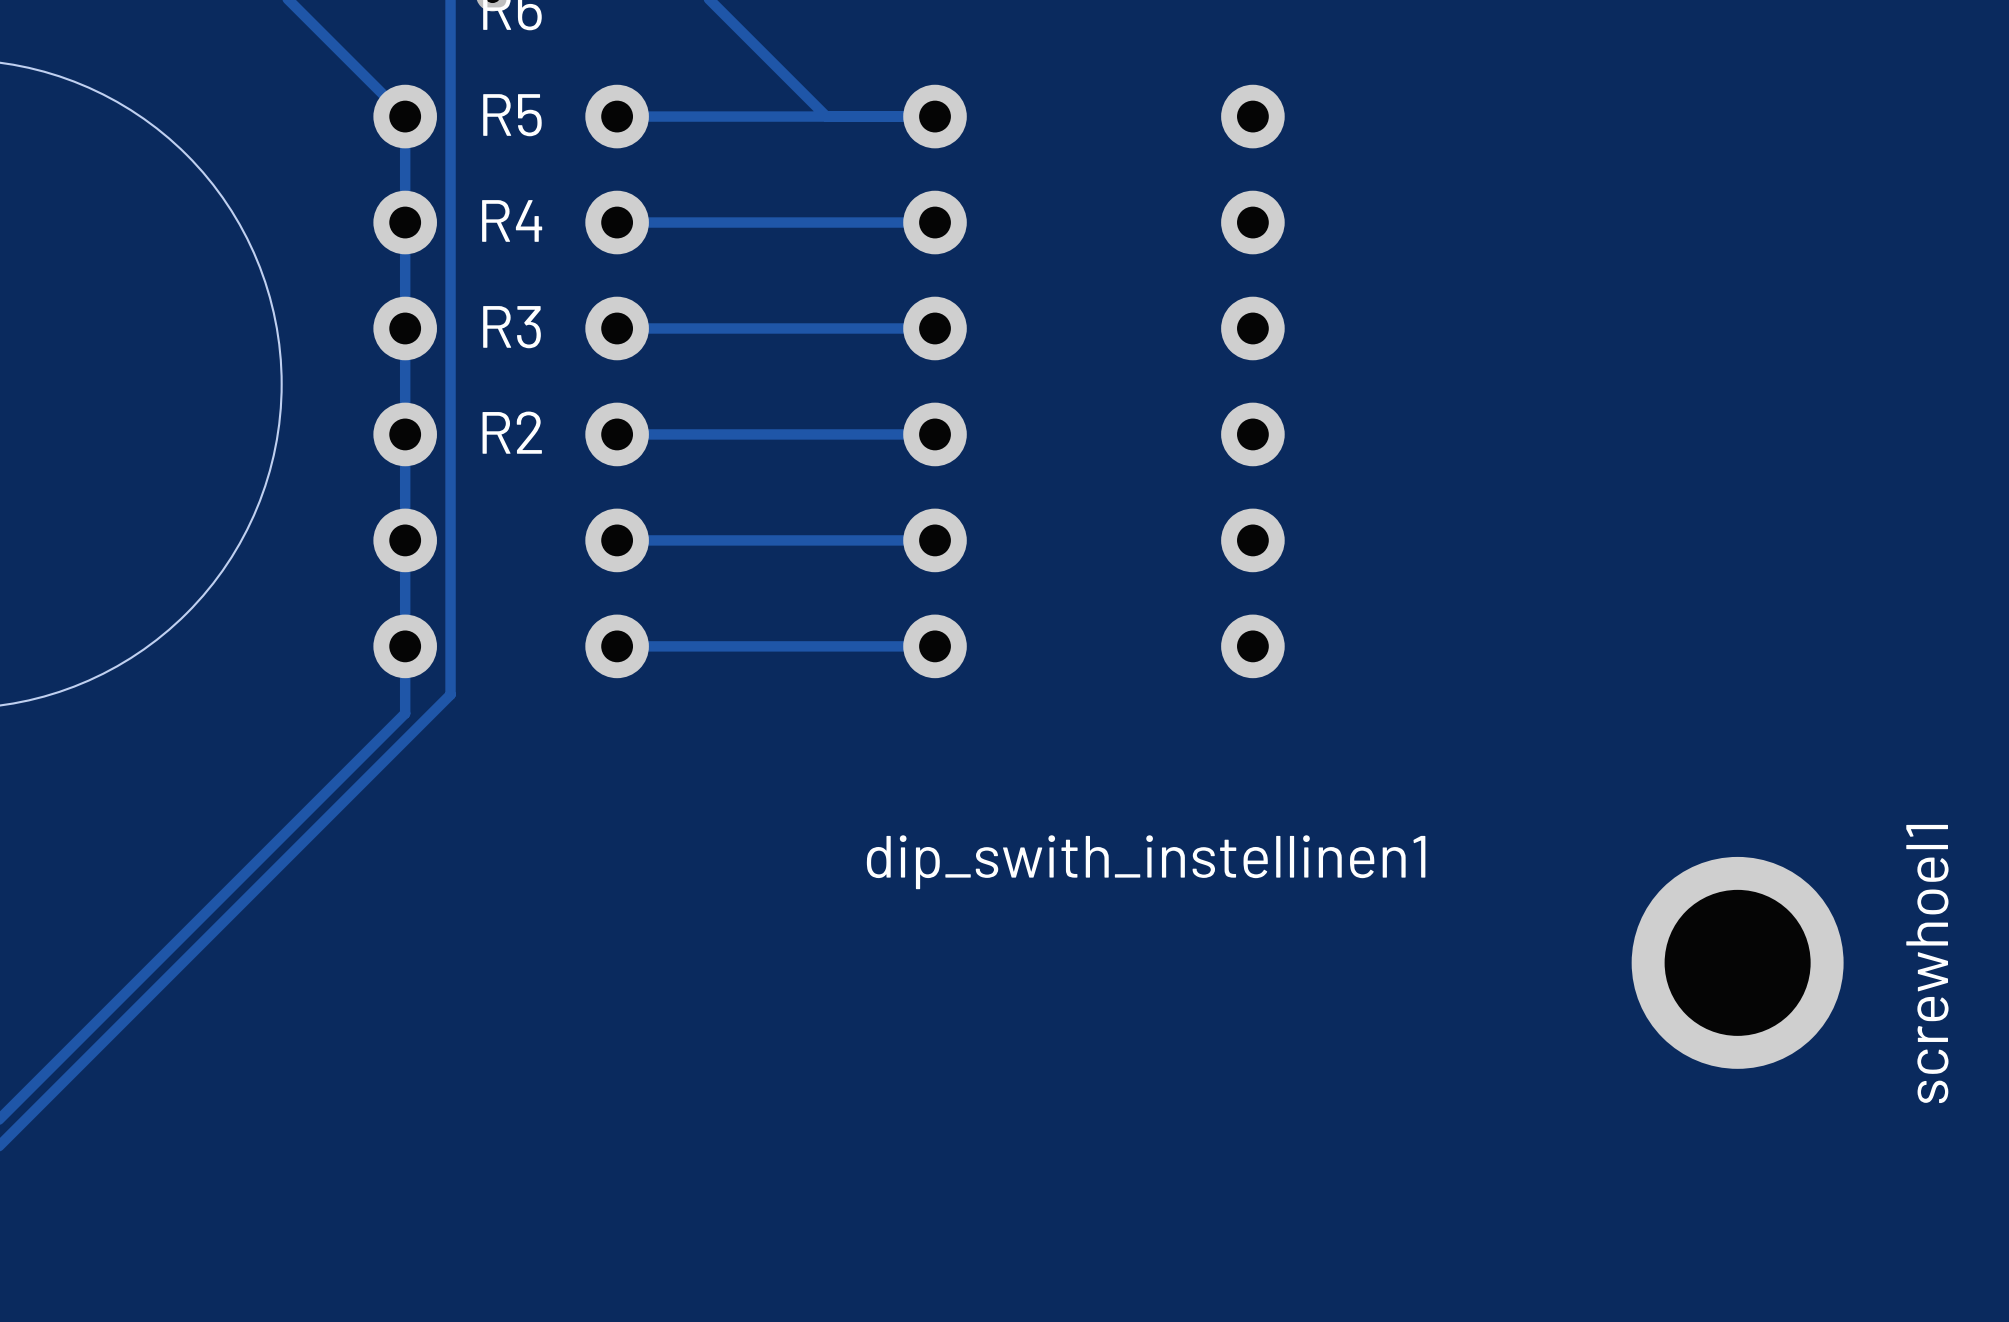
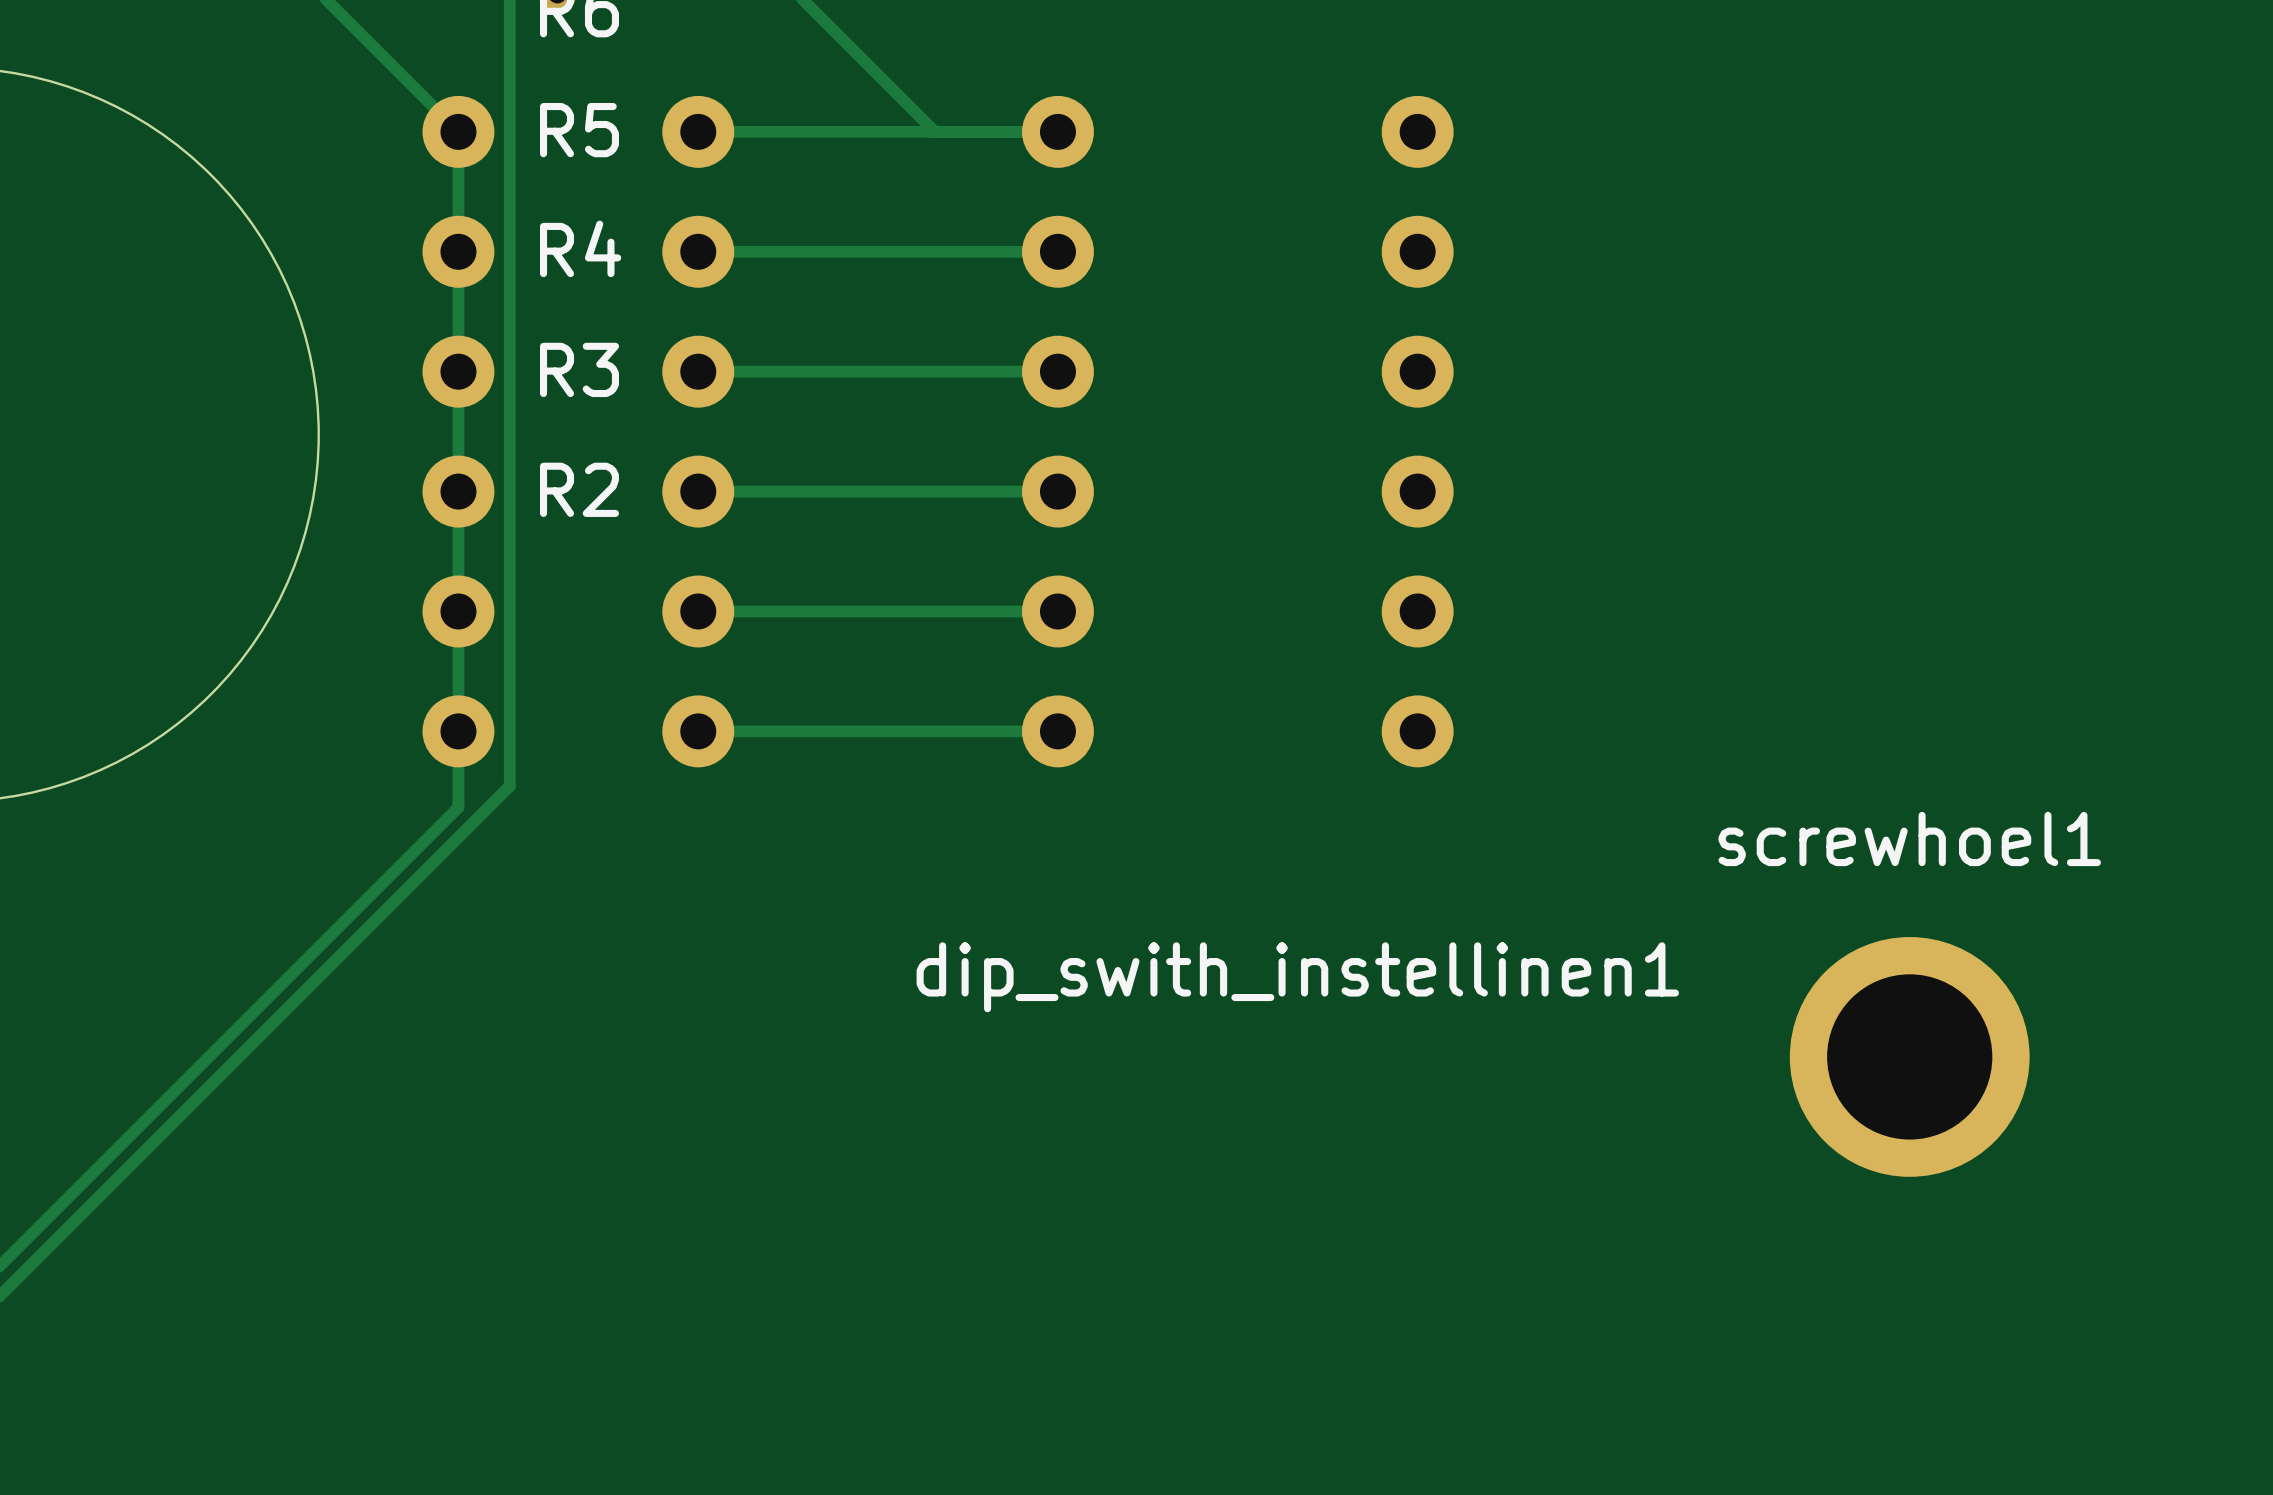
screwhoel1 position: (1737, 962) -> (1909, 1056)
screwhoel1 name rotation: 0° (1927, 963) -> 90° clockwise (1909, 838)

